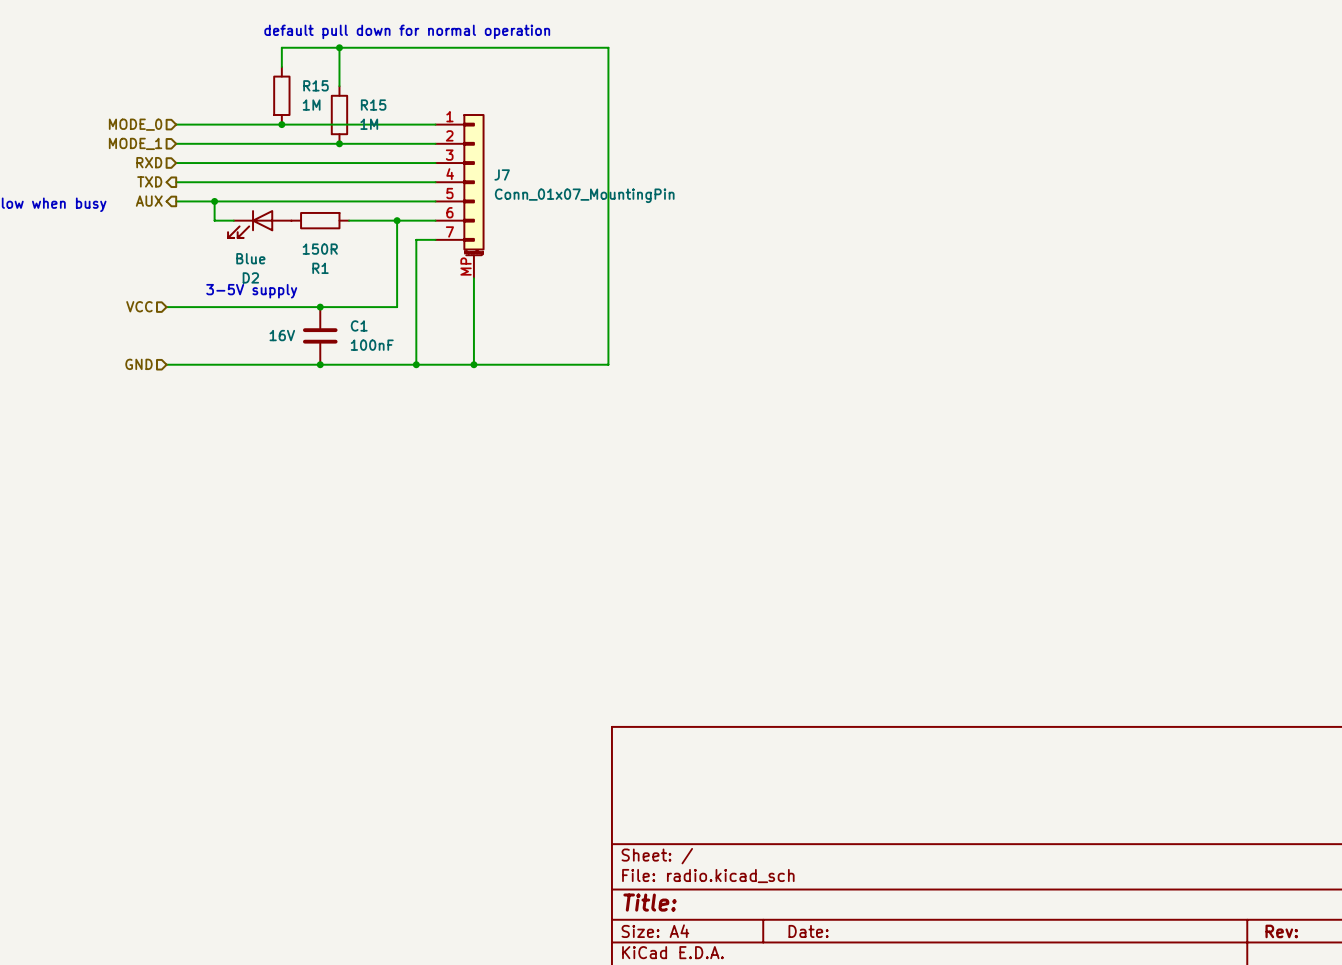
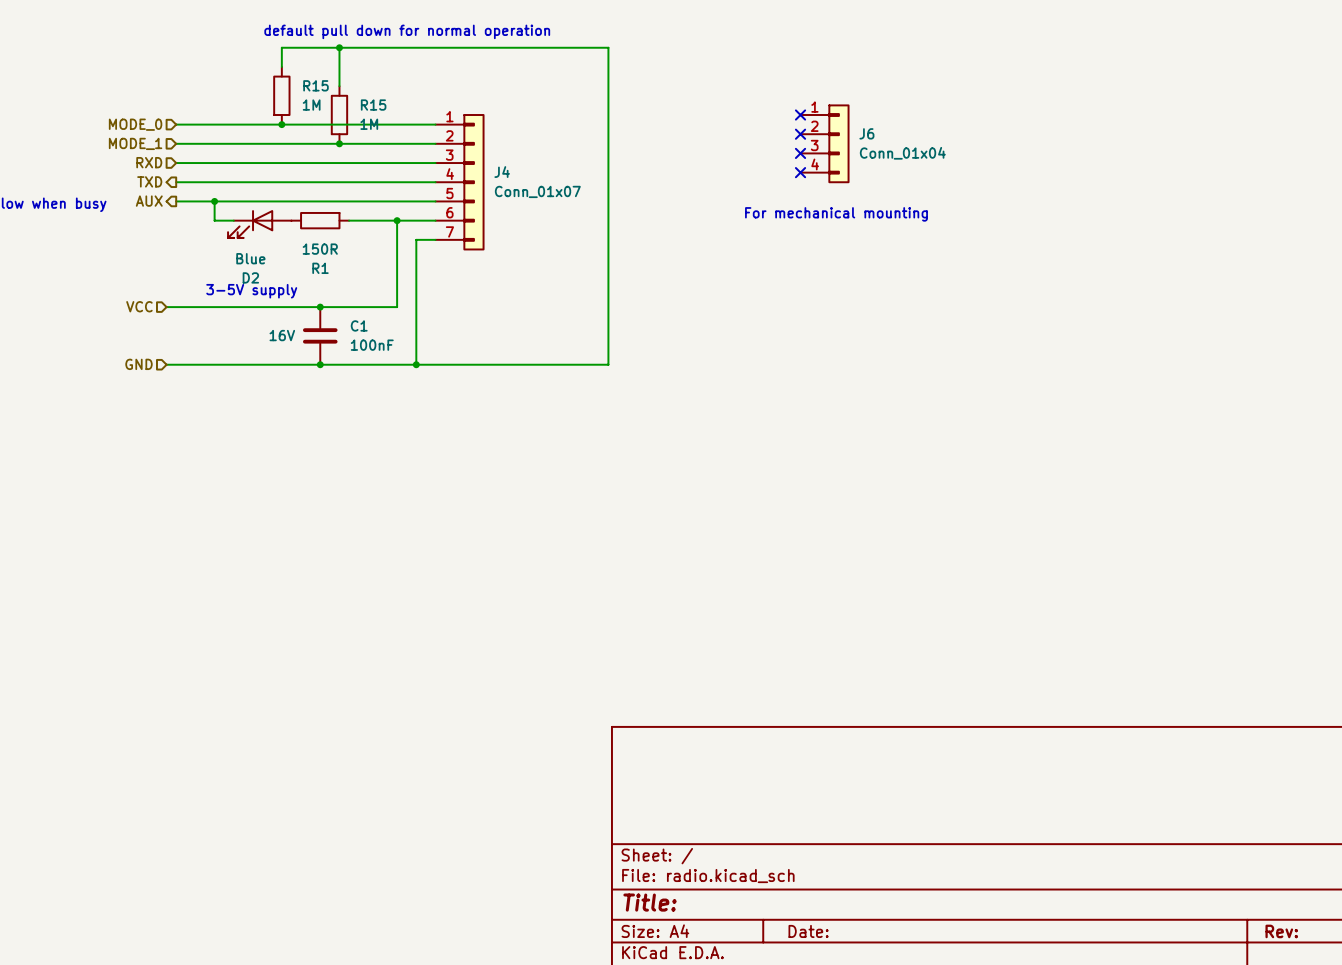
no-connect mark: none -> (800, 115)
no-connect mark: none -> (800, 134)
J6: none -> Conn_01x04 (825, 143)
no-connect mark: none -> (800, 153)
no-connect mark: none -> (800, 172)
J4: none -> Conn_01x07 (460, 182)
J7: Conn_01x07_MountingPin (460, 196) -> none
text: none -> For mechanical mounting (836, 214)
wire: (473, 278) (473, 364) -> none
junction: (473, 364) -> none

